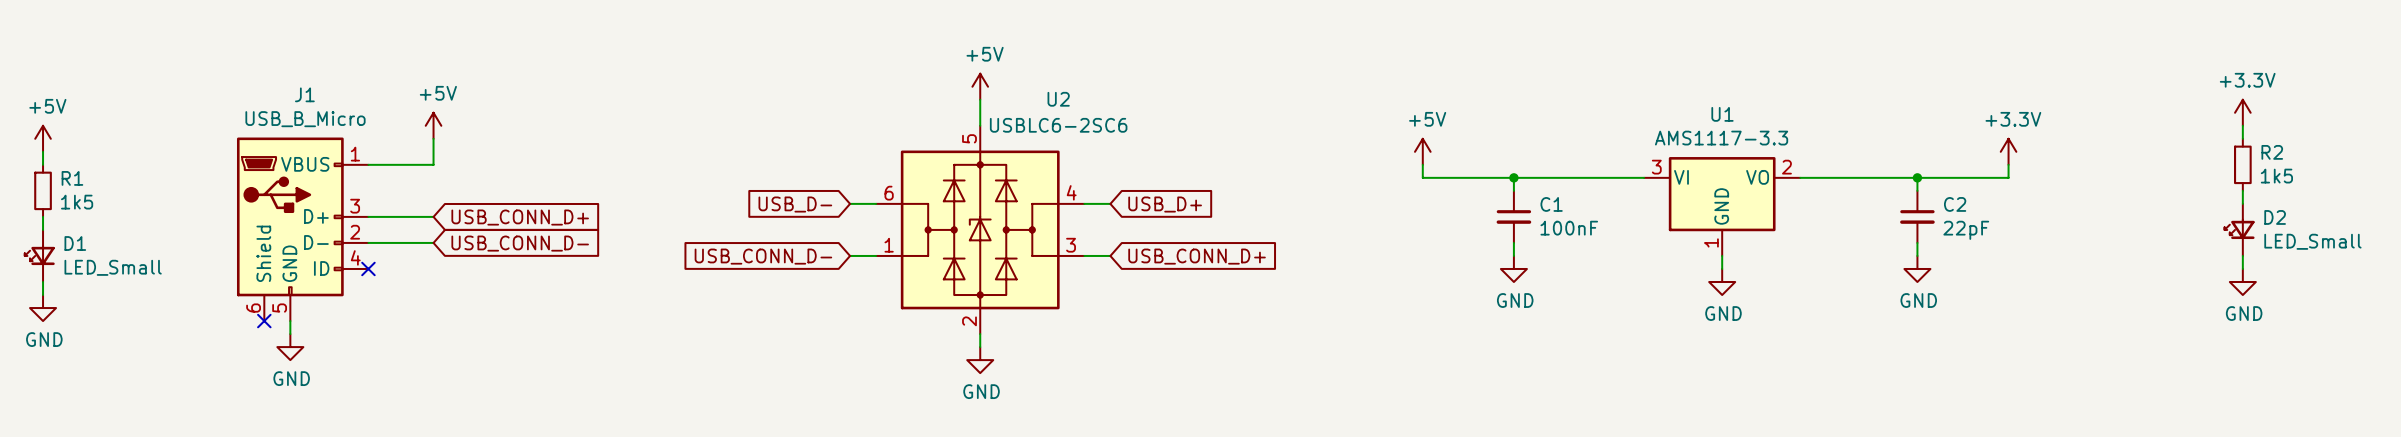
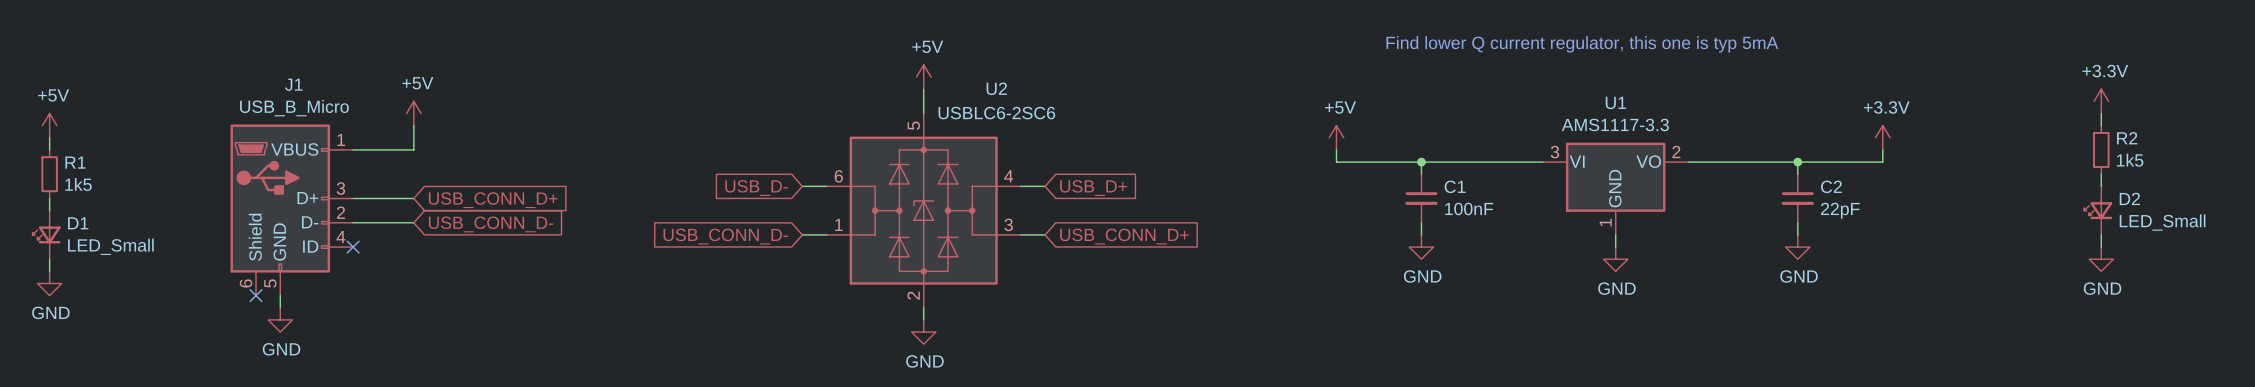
text: none -> Find lower Q current regulator, this one is typ 5mA (1582, 44)

